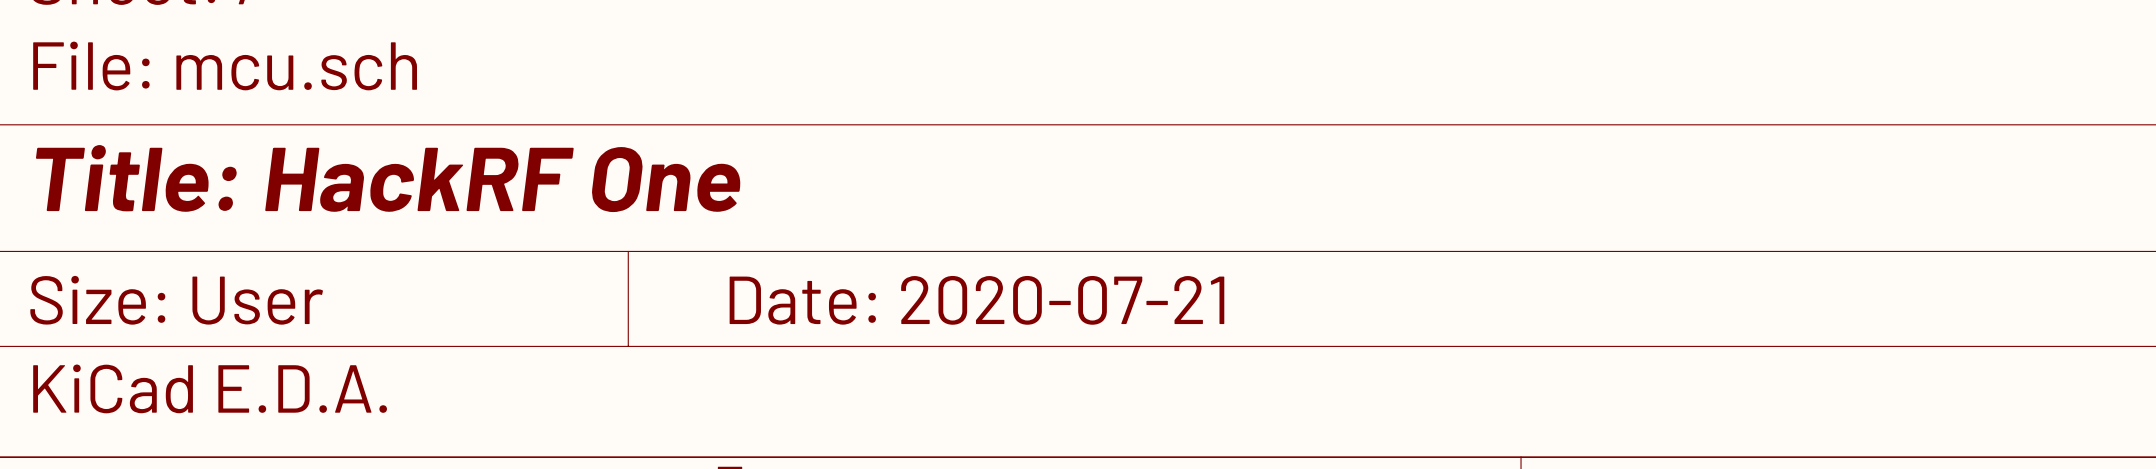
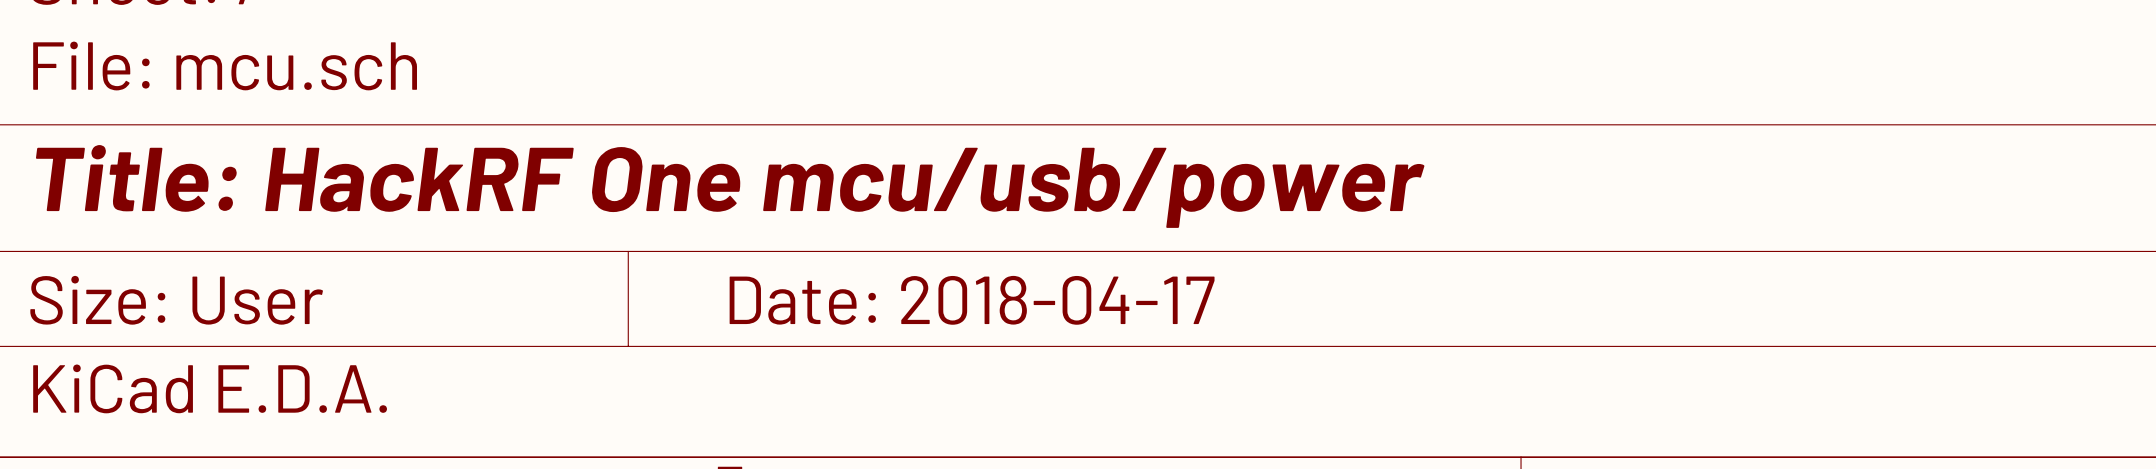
title block: Title: HackRF One (388, 178) -> Title: HackRF One mcu/usb/power (730, 186)
title block: Date: 2020-07-21 (976, 300) -> Date: 2018-04-17 (972, 300)

